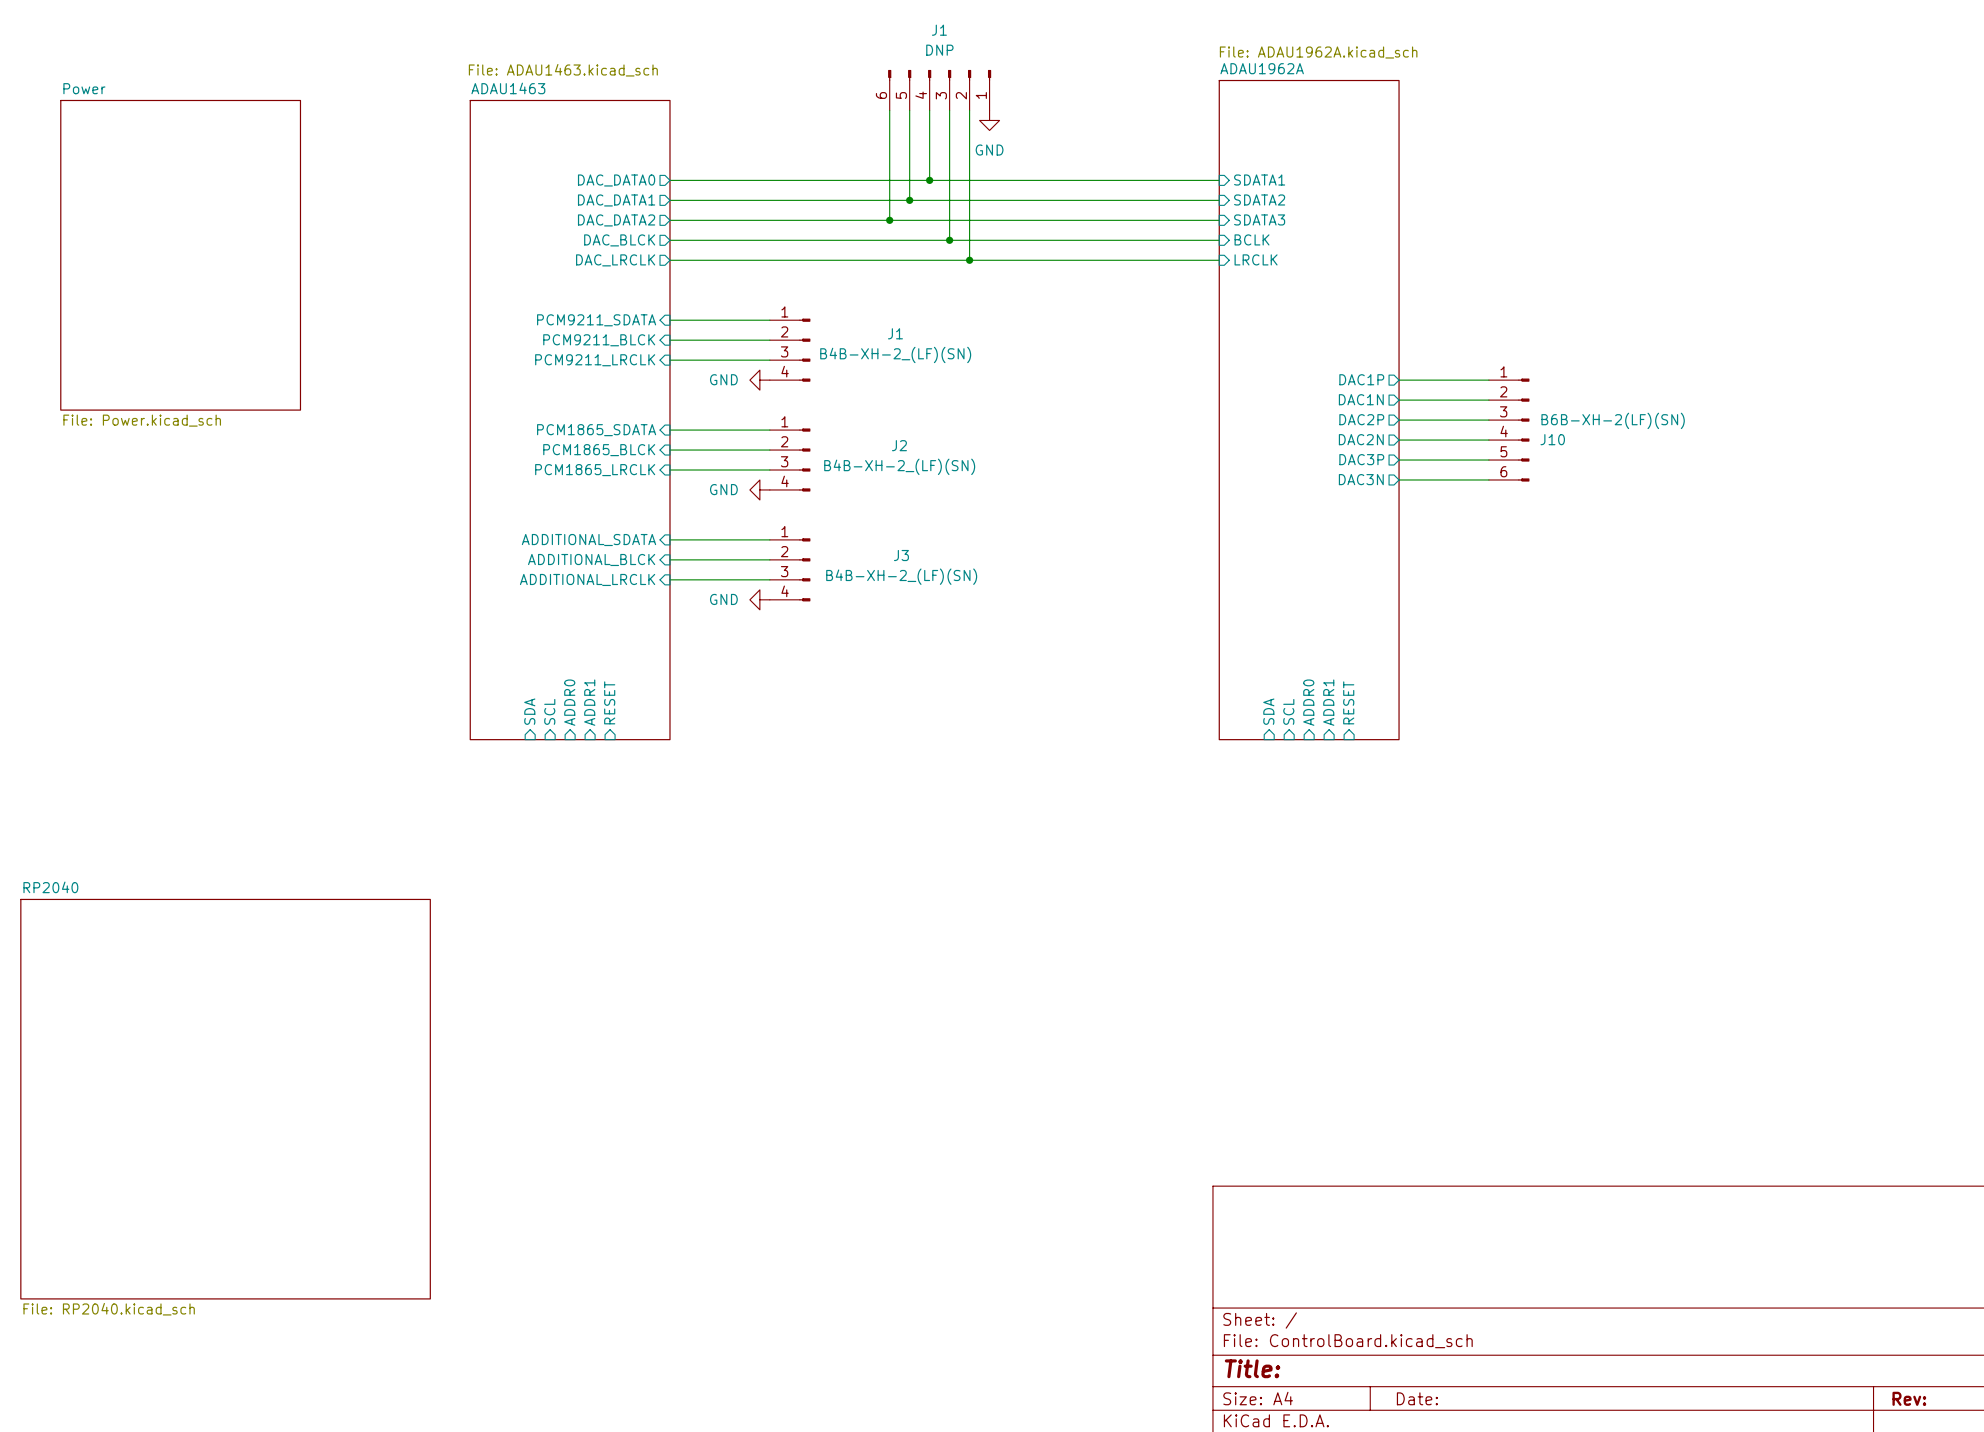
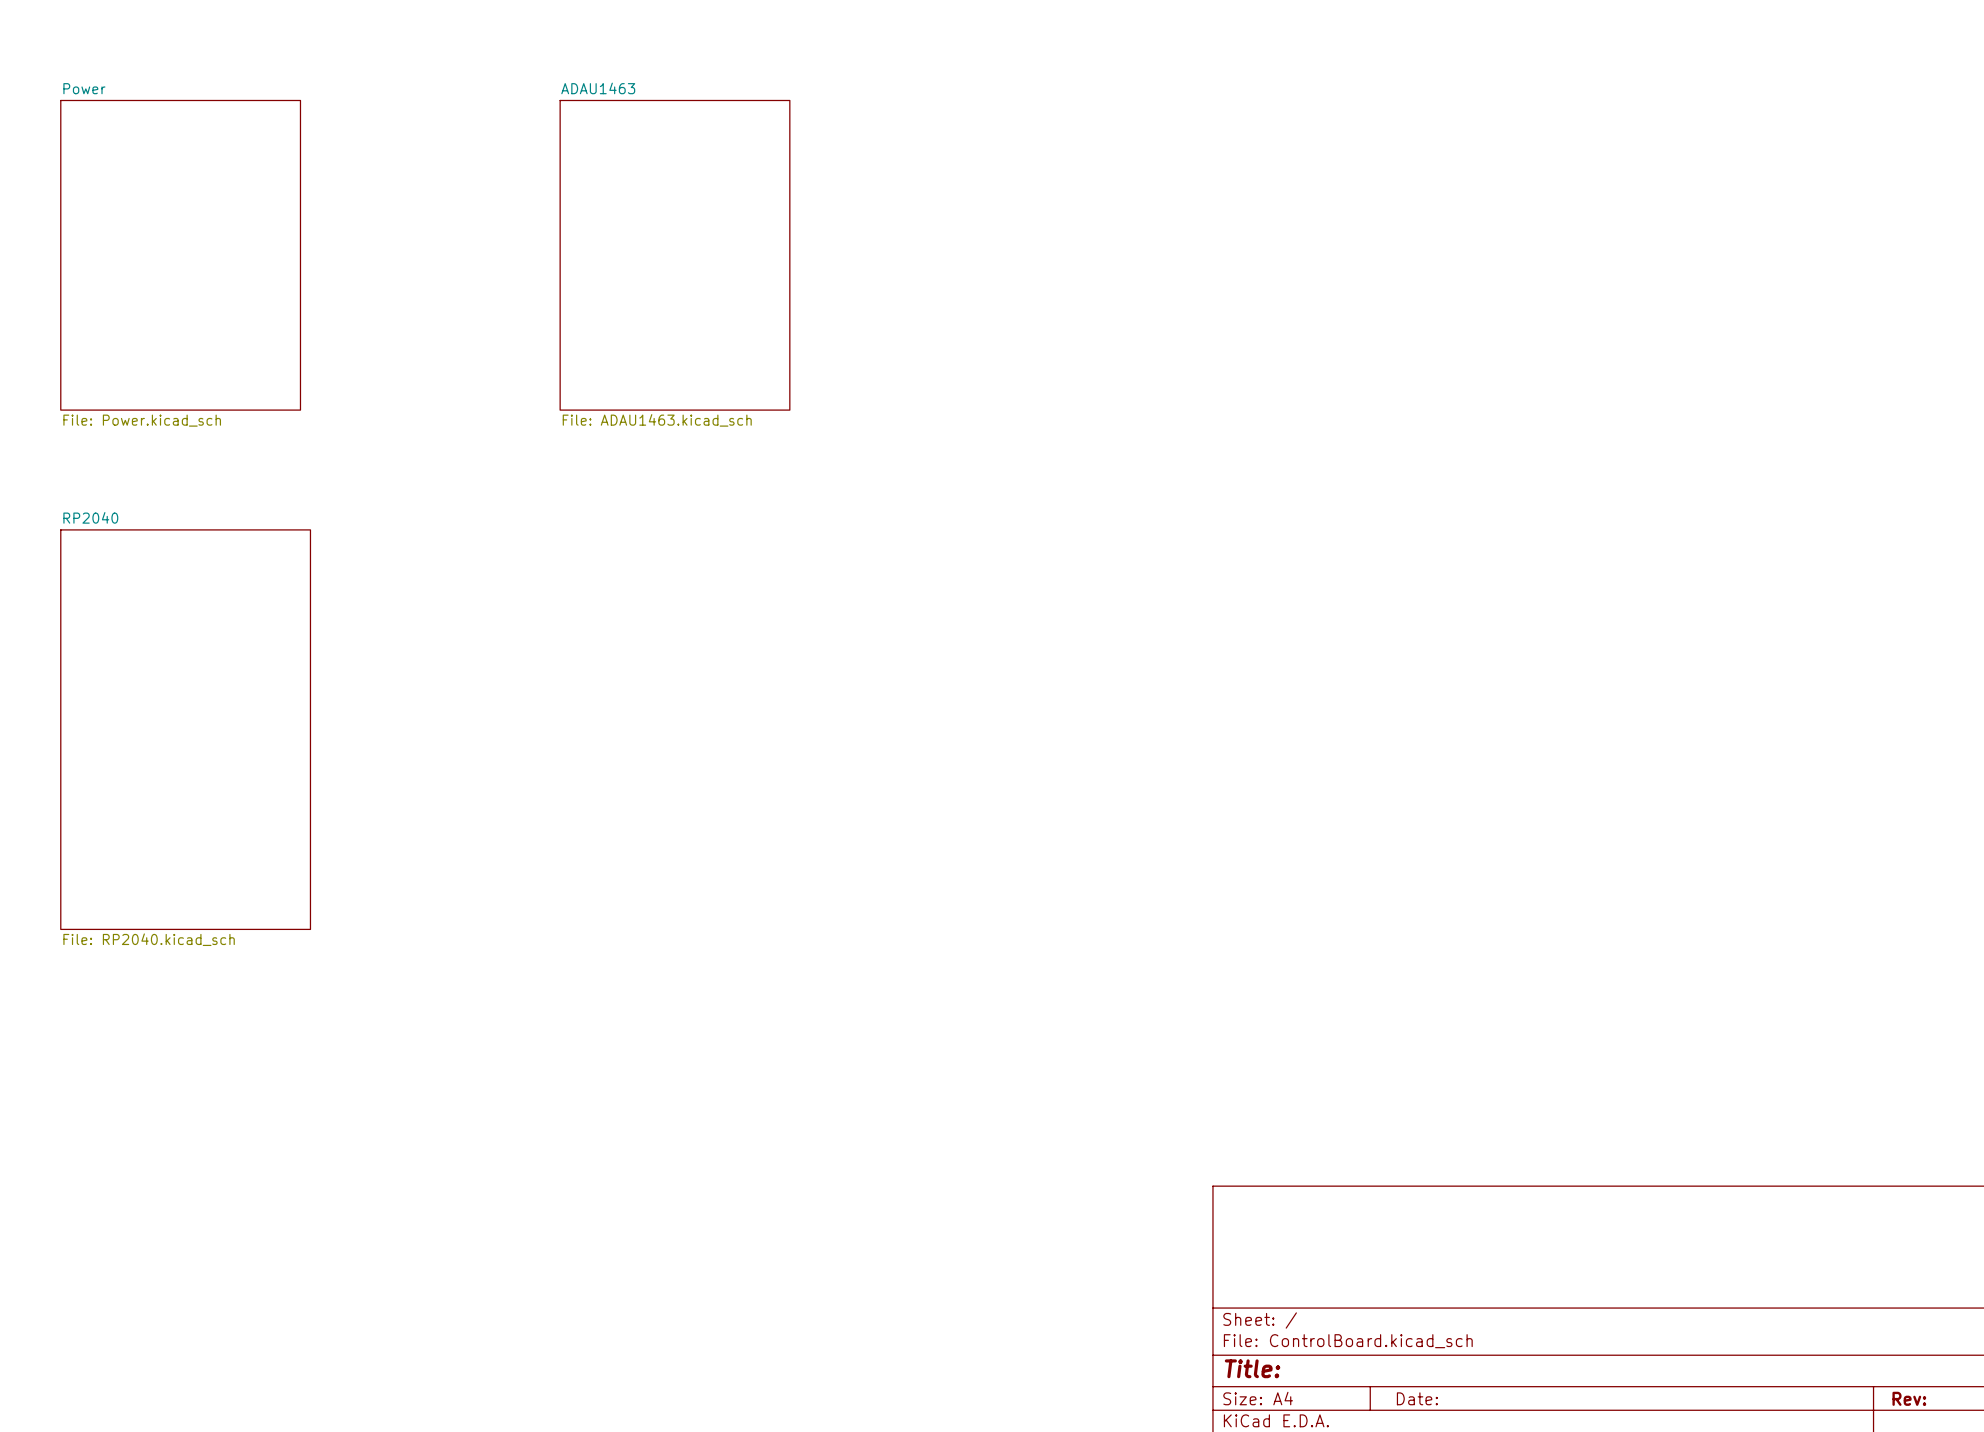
sheet ADAU1463 value position: File: ADAU1463.kicad_sch (563, 70) -> File: ADAU1463.kicad_sch (657, 420)
sheet ADAU1463 name position: ADAU1463 (508, 88) -> ADAU1463 (598, 88)
J1: DNP (939, 90) -> none
sheet ADAU1463 shape: [469, 99, 671, 741] -> [559, 99, 791, 411]
wire: (889, 110) (889, 220) -> none
wire: (909, 110) (909, 200) -> none
wire: (929, 110) (929, 180) -> none
wire: (949, 110) (949, 240) -> none
wire: (969, 110) (969, 260) -> none
power symbol: GND (989, 120) -> none
sheet pin: DAC_DATA0 (616, 180) -> none
wire: (669, 180) (1219, 180) -> none
junction: (929, 180) -> none
sheet pin: SDATA1 (1259, 180) -> none
sheet pin: SDATA2 (1259, 199) -> none
sheet pin: DAC_DATA1 (616, 200) -> none
wire: (669, 200) (1219, 200) -> none
junction: (909, 200) -> none
sheet pin: SDATA3 (1259, 219) -> none
sheet pin: DAC_DATA2 (616, 220) -> none
wire: (669, 220) (1219, 220) -> none
junction: (889, 220) -> none
sheet pin: BCLK (1252, 239) -> none
sheet pin: DAC_BLCK (619, 240) -> none
wire: (669, 240) (1219, 240) -> none
junction: (949, 240) -> none
sheet pin: LRCLK (1256, 259) -> none
sheet pin: DAC_LRCLK (615, 260) -> none
wire: (669, 260) (1219, 260) -> none
junction: (969, 260) -> none
sheet pin: PCM9211_SDATA (596, 320) -> none
wire: (669, 320) (769, 320) -> none
sheet pin: PCM9211_BLCK (599, 340) -> none
wire: (669, 340) (769, 340) -> none
J1: B4B-XH-2_(LF)(SN) (790, 350) -> none
sheet pin: PCM9211_LRCLK (595, 360) -> none
wire: (669, 360) (769, 360) -> none
sheet pin: DAC1P (1361, 379) -> none
power symbol: GND (759, 380) -> none
wire: (1399, 380) (1488, 380) -> none
sheet pin: DAC1N (1361, 399) -> none
wire: (1399, 400) (1488, 400) -> none
sheet ADAU1962A: File: ADAU1962A.kicad_sch (1309, 410) -> none
sheet pin: DAC2P (1361, 419) -> none
wire: (1399, 420) (1488, 420) -> none
sheet pin: PCM1865_SDATA (596, 430) -> none
wire: (669, 430) (769, 430) -> none
J10: B6B-XH-2(LF)(SN) (1509, 430) -> none
sheet pin: DAC2N (1361, 439) -> none
wire: (1399, 440) (1488, 440) -> none
sheet pin: PCM1865_BLCK (599, 450) -> none
wire: (669, 450) (769, 450) -> none
sheet pin: DAC3P (1361, 459) -> none
J2: B4B-XH-2_(LF)(SN) (790, 460) -> none
wire: (1399, 460) (1488, 460) -> none
sheet pin: PCM1865_LRCLK (595, 470) -> none
wire: (669, 470) (769, 470) -> none
sheet pin: DAC3N (1361, 479) -> none
wire: (1399, 479) (1488, 479) -> none
power symbol: GND (759, 489) -> none
wire: (669, 539) (769, 539) -> none
sheet pin: ADDITIONAL_SDATA (588, 540) -> none
sheet pin: ADDITIONAL_BLCK (591, 559) -> none
wire: (669, 559) (769, 559) -> none
J3: B4B-XH-2_(LF)(SN) (790, 569) -> none
sheet pin: ADDITIONAL_LRCLK (587, 579) -> none
wire: (669, 579) (769, 579) -> none
power symbol: GND (759, 599) -> none
sheet pin: ADDR0 (569, 702) -> none
sheet pin: ADDR1 (589, 702) -> none
sheet pin: RESET (609, 702) -> none
sheet pin: ADDR0 (1308, 702) -> none
sheet pin: ADDR1 (1328, 702) -> none
sheet pin: RESET (1348, 702) -> none
sheet pin: SDA (529, 711) -> none
sheet pin: SCL (549, 711) -> none
sheet pin: SDA (1268, 711) -> none
sheet pin: SCL (1288, 711) -> none
sheet RP2040 name position: RP2040 (50, 887) -> RP2040 (90, 517)
sheet RP2040 shape: [20, 898, 431, 1300] -> [60, 529, 312, 931]
sheet RP2040 value position: File: RP2040.kicad_sch (109, 1309) -> File: RP2040.kicad_sch (149, 939)

